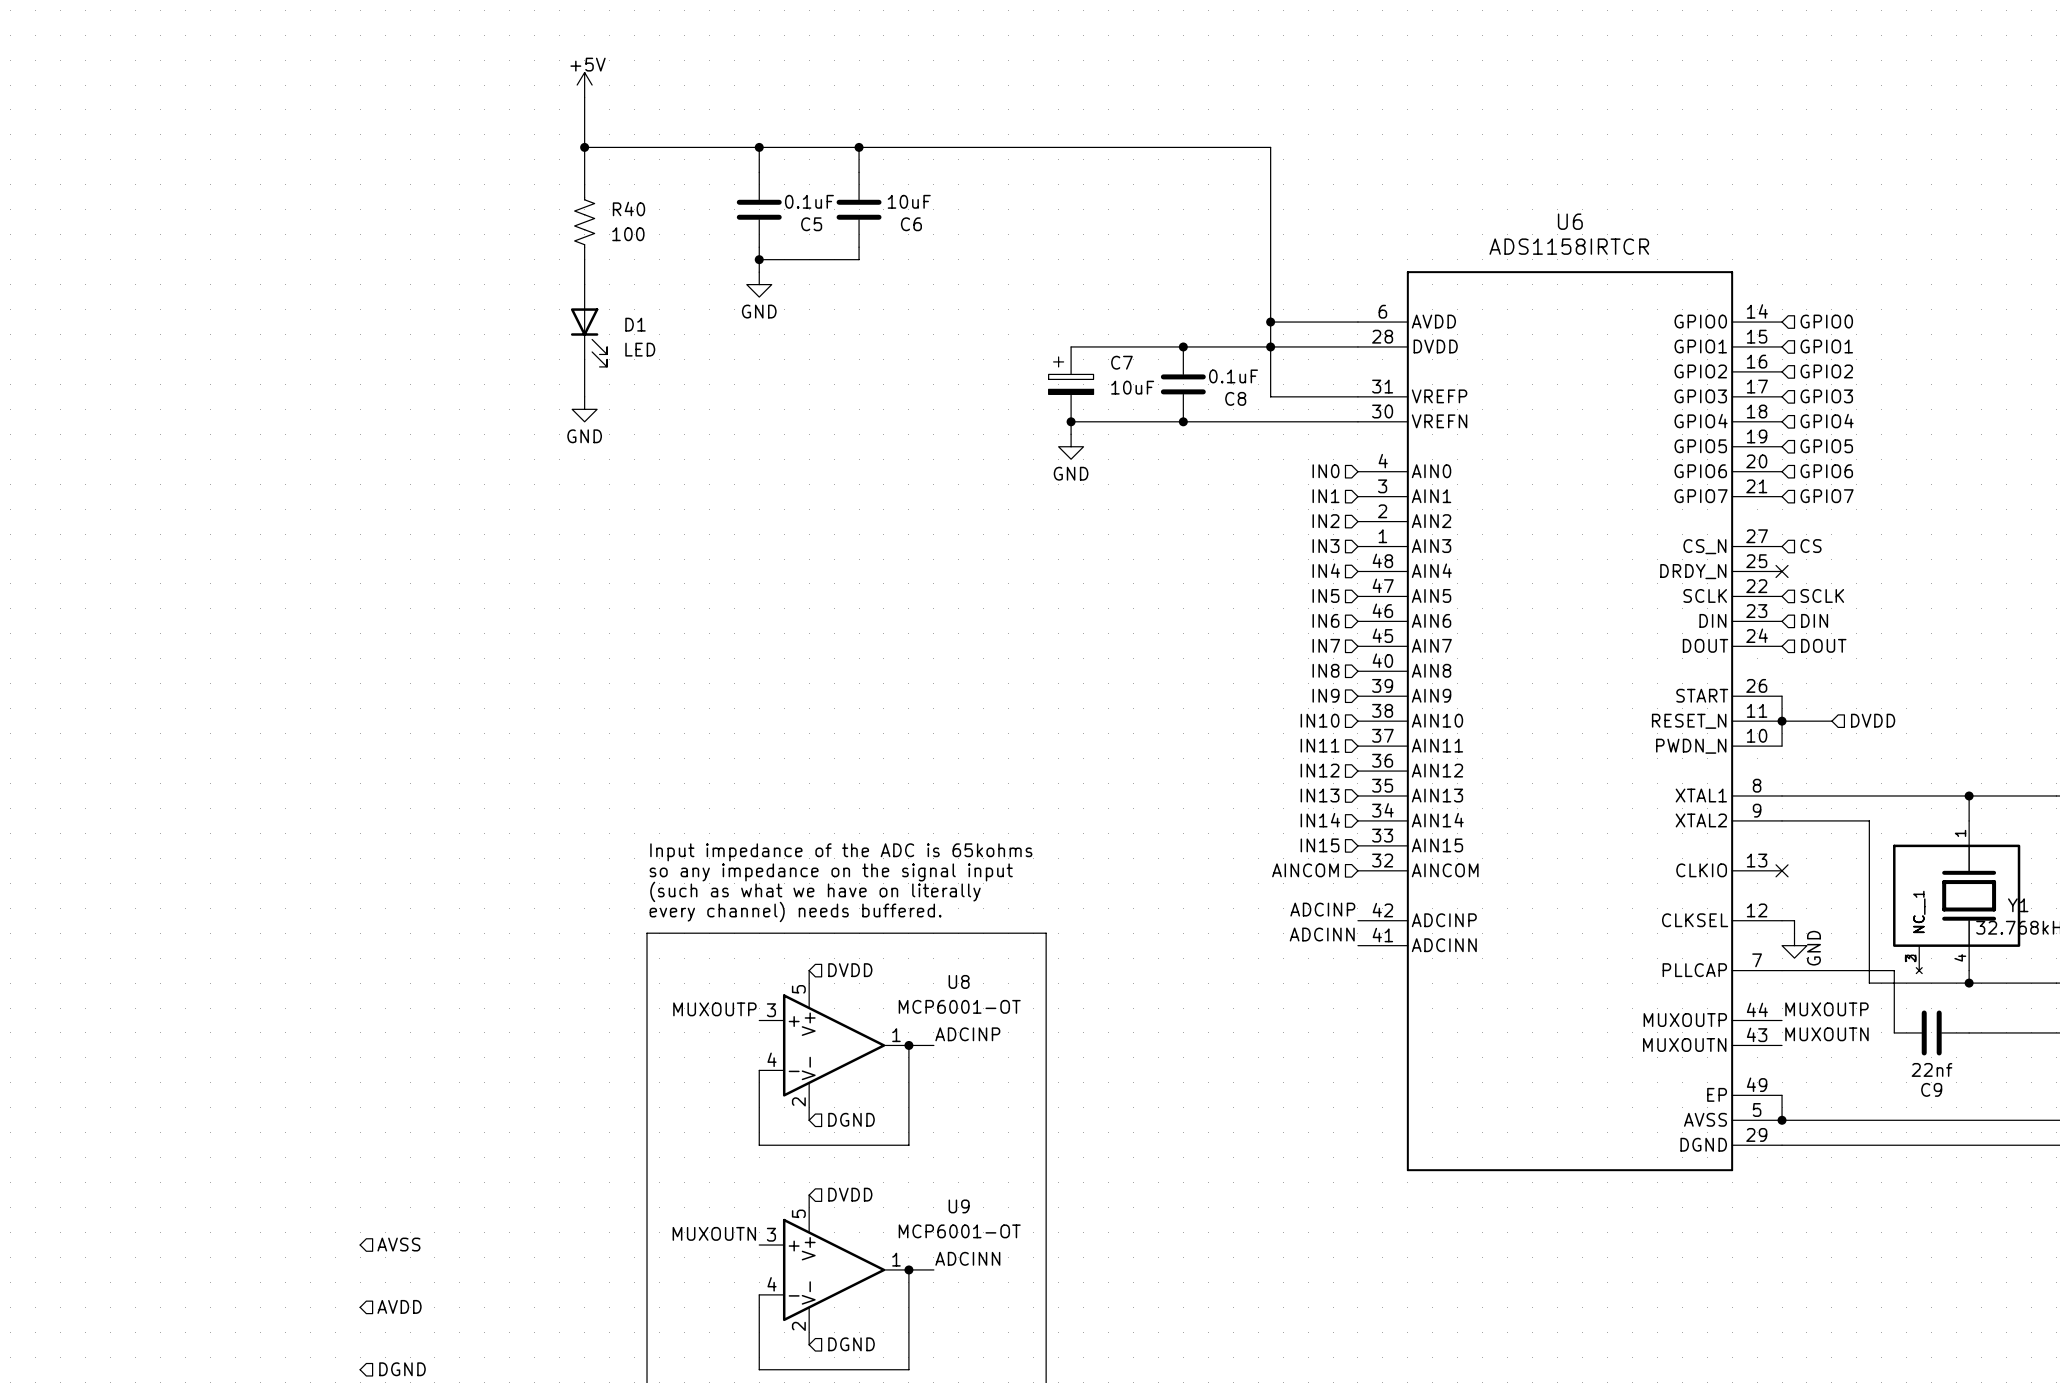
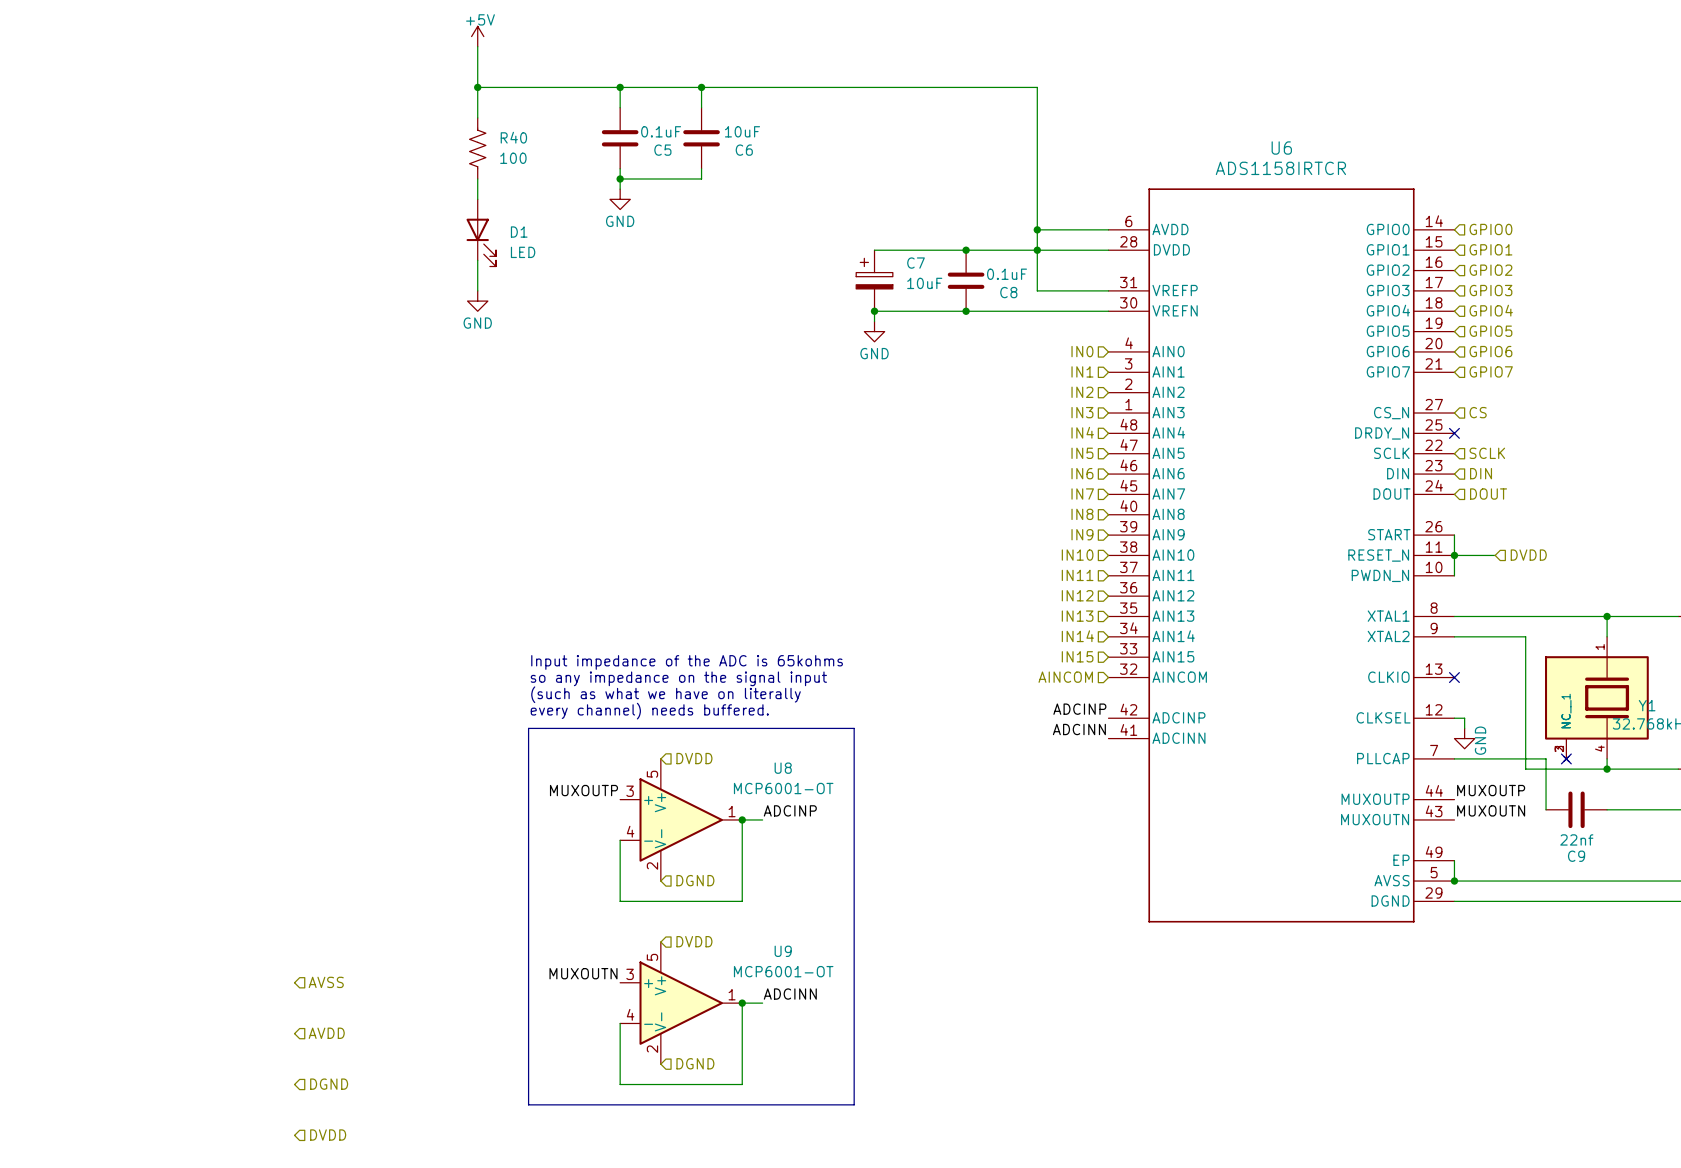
no-connect mark: none -> (1566, 758)

